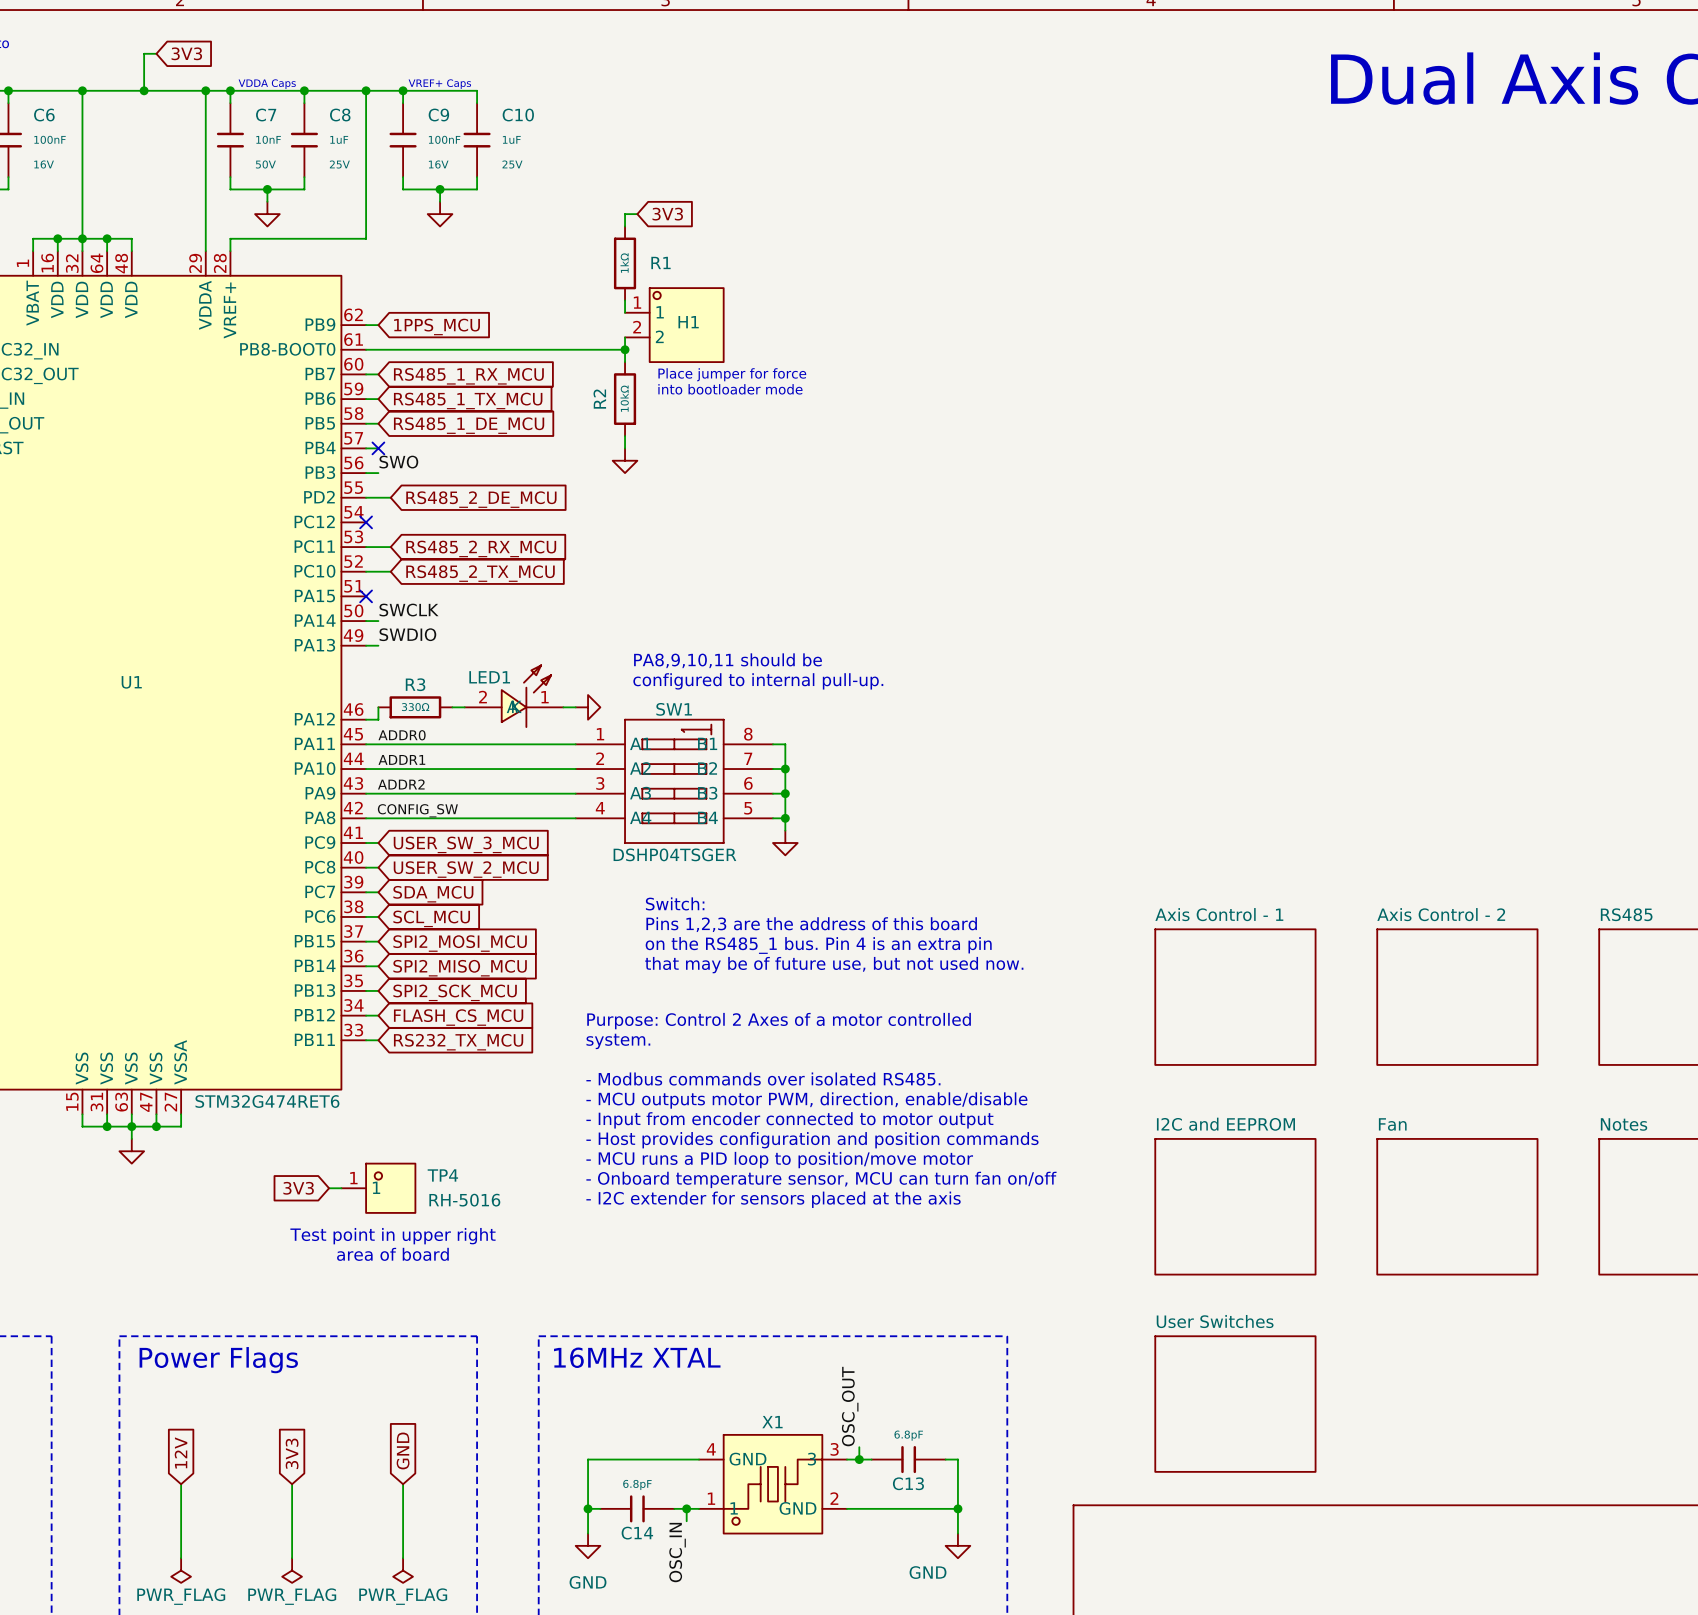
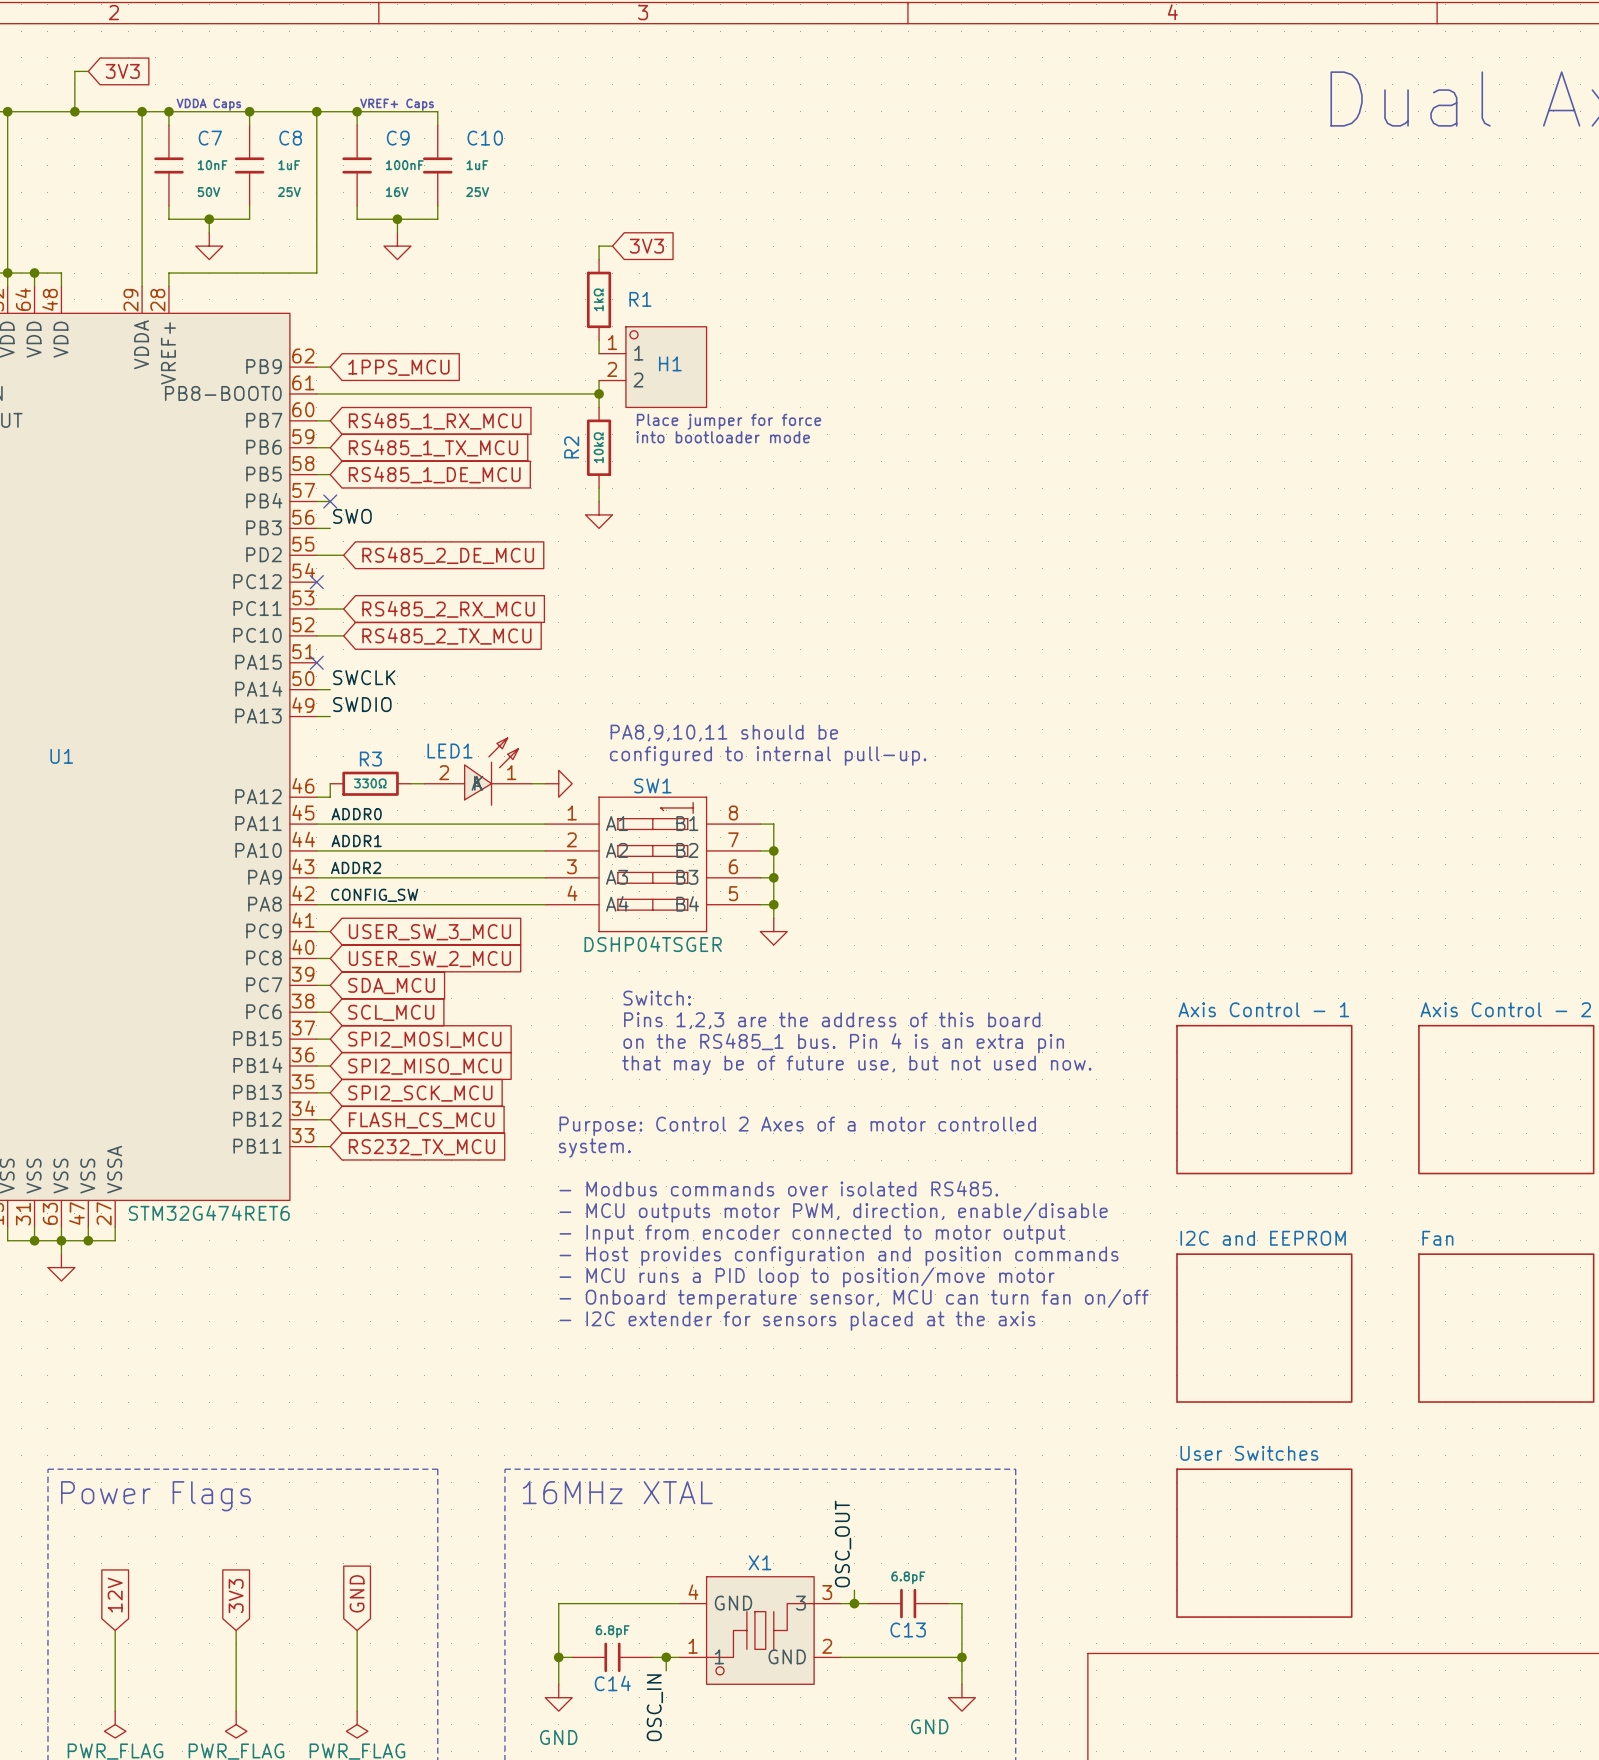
global label: 3V3 (298, 1188) -> none
wire: (329, 1188) (341, 1188) -> none
TP4: RH-5016 (378, 1188) -> none
text: Test point in upper right (392, 1236) -> none
text: area of board (392, 1254) -> none

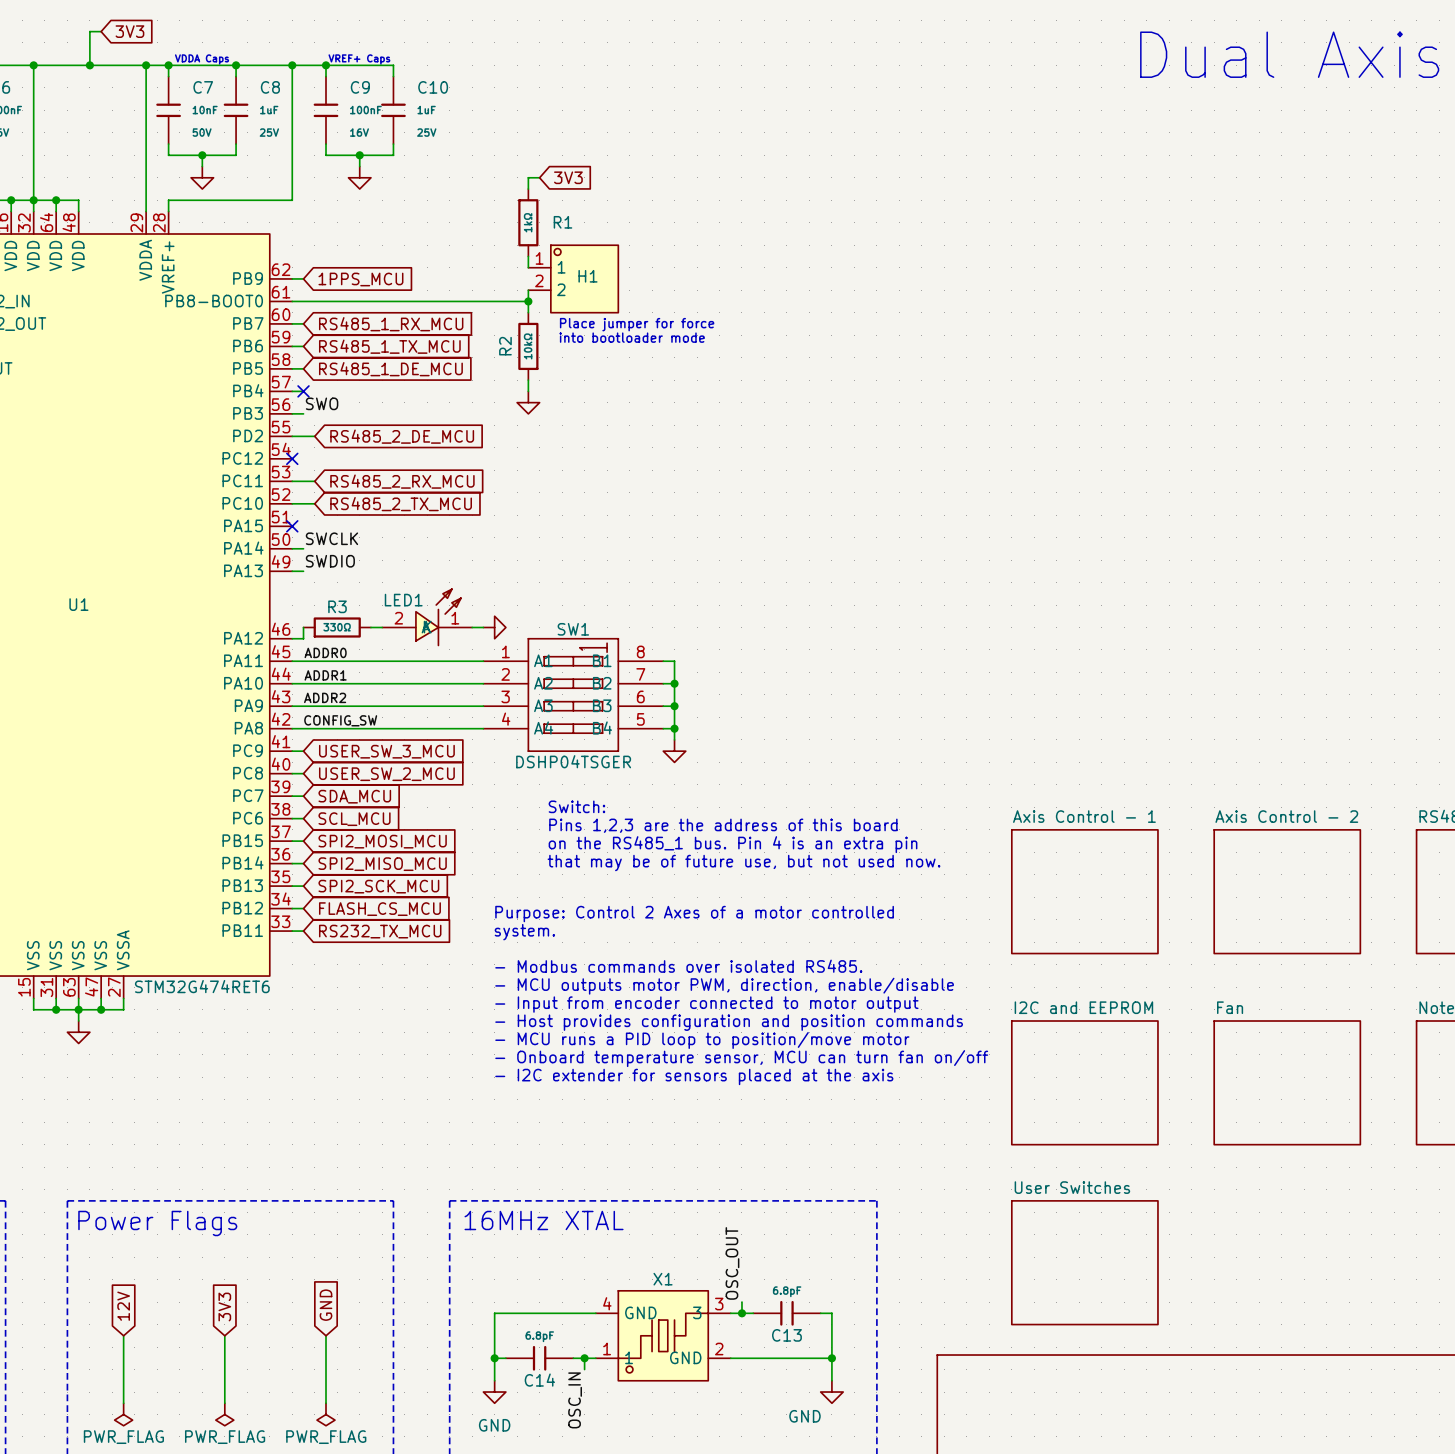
text: PA8,9,10,11 should be (724, 733) -> none
text: configured to internal pull-up. (768, 756) -> none

